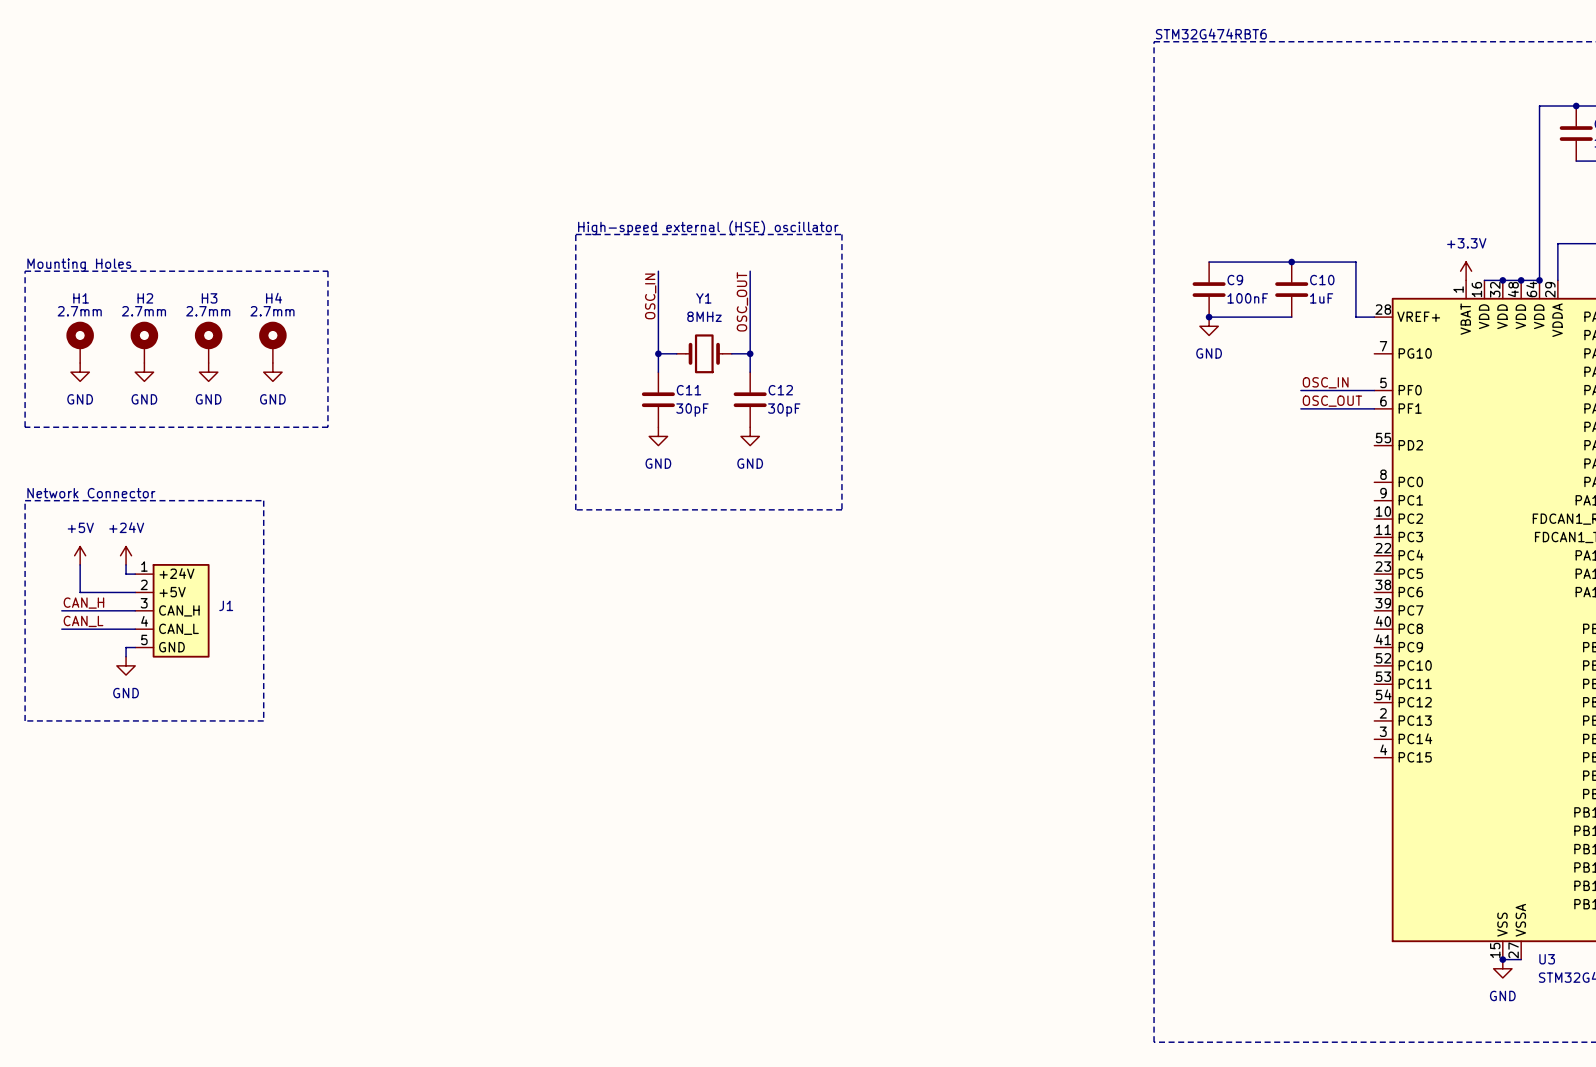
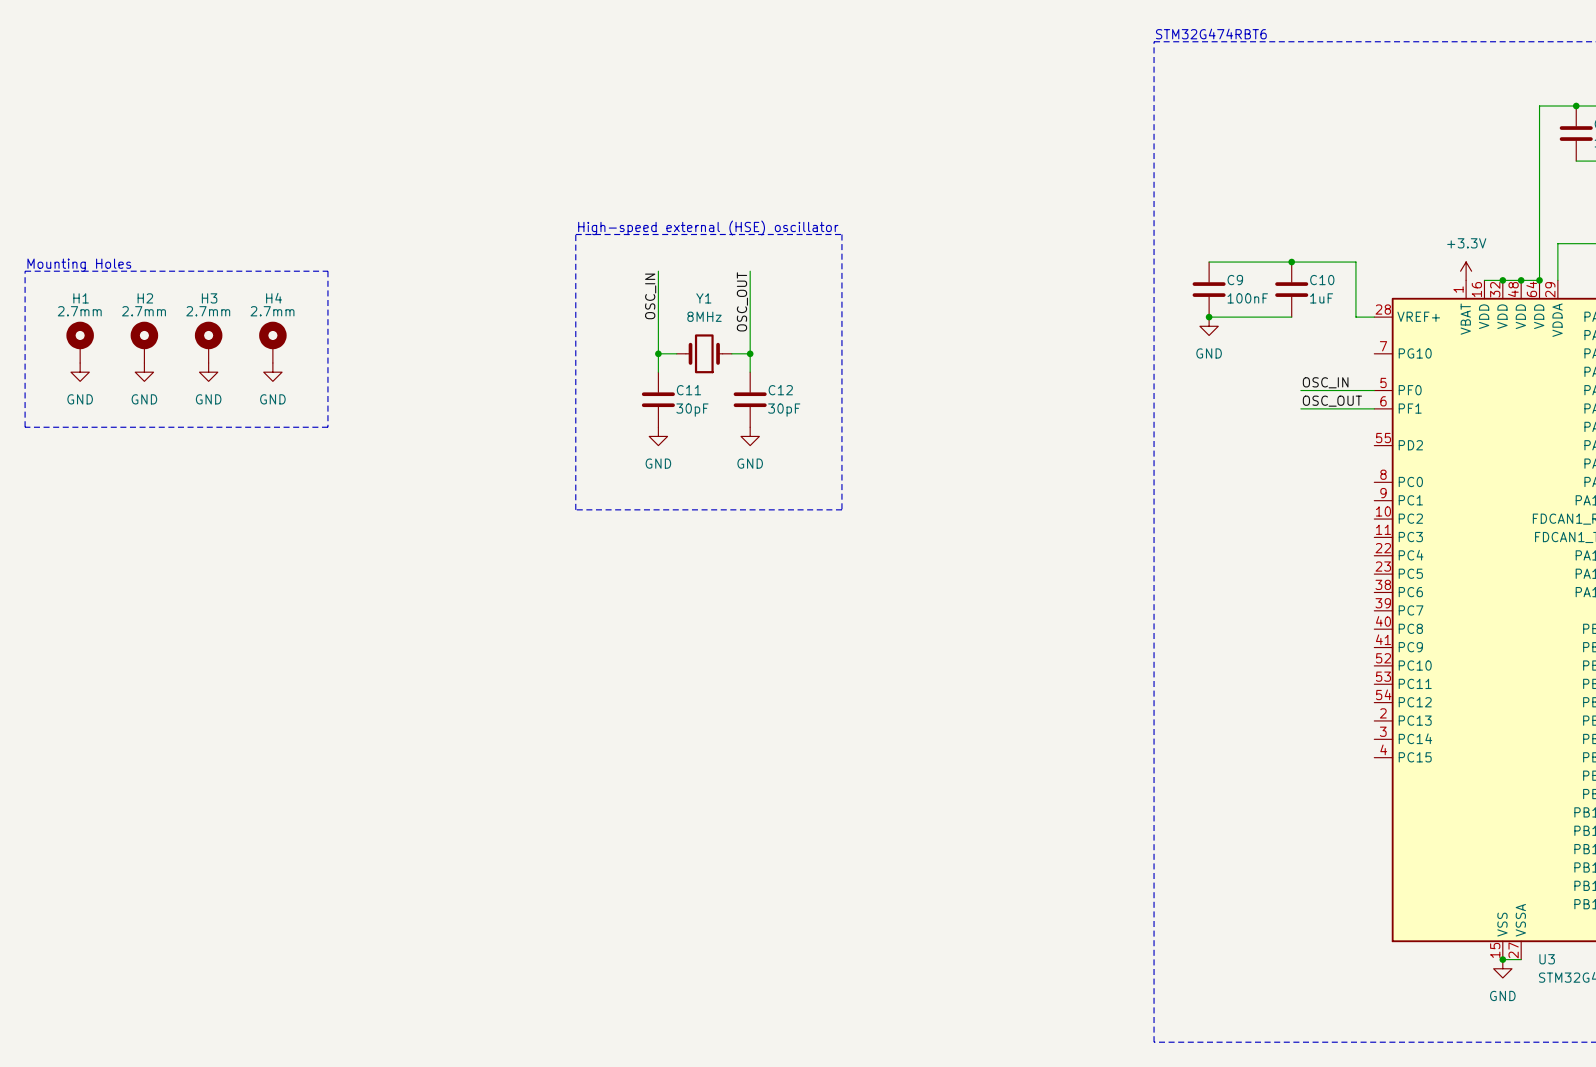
text: Network Connector (91, 493) -> none
line: (25, 500) (263, 500) (263, 720) (25, 720) (25, 500) -> none
power symbol: +5V (80, 555) -> none
power symbol: +24V (126, 555) -> none
wire: (80, 564) (80, 592) (135, 592) -> none
wire: (126, 564) (126, 574) (135, 574) -> none
label: CAN_H (83, 603) -> none
wire: (61, 610) (135, 610) -> none
J1: (172, 610) -> none
label: CAN_L (83, 621) -> none
wire: (61, 629) (135, 629) -> none
wire: (135, 647) (126, 647) (126, 656) -> none
power symbol: GND (126, 665) -> none

